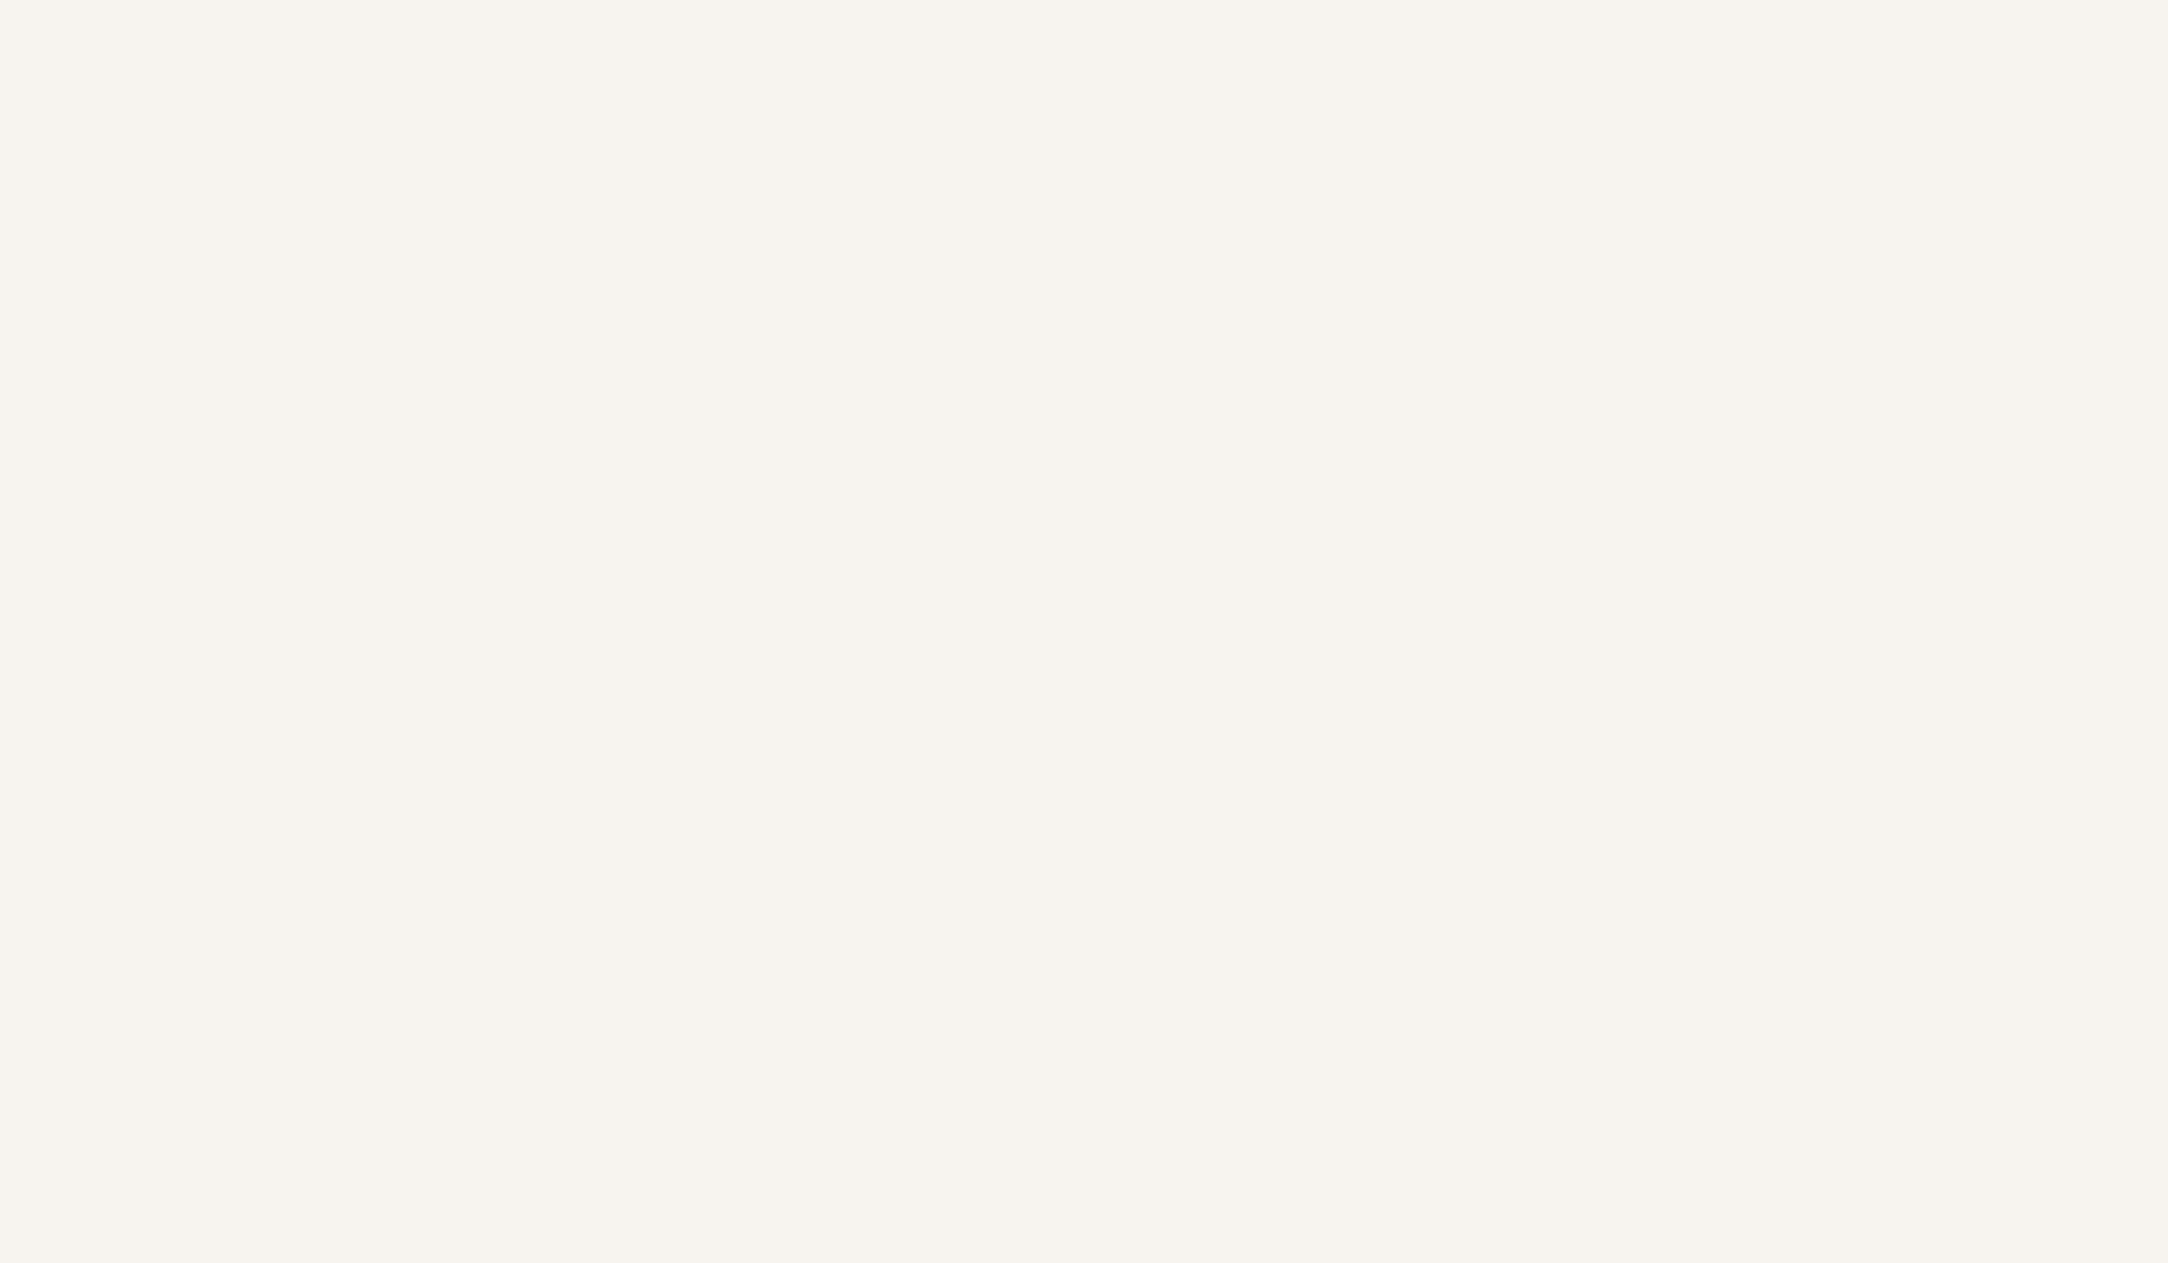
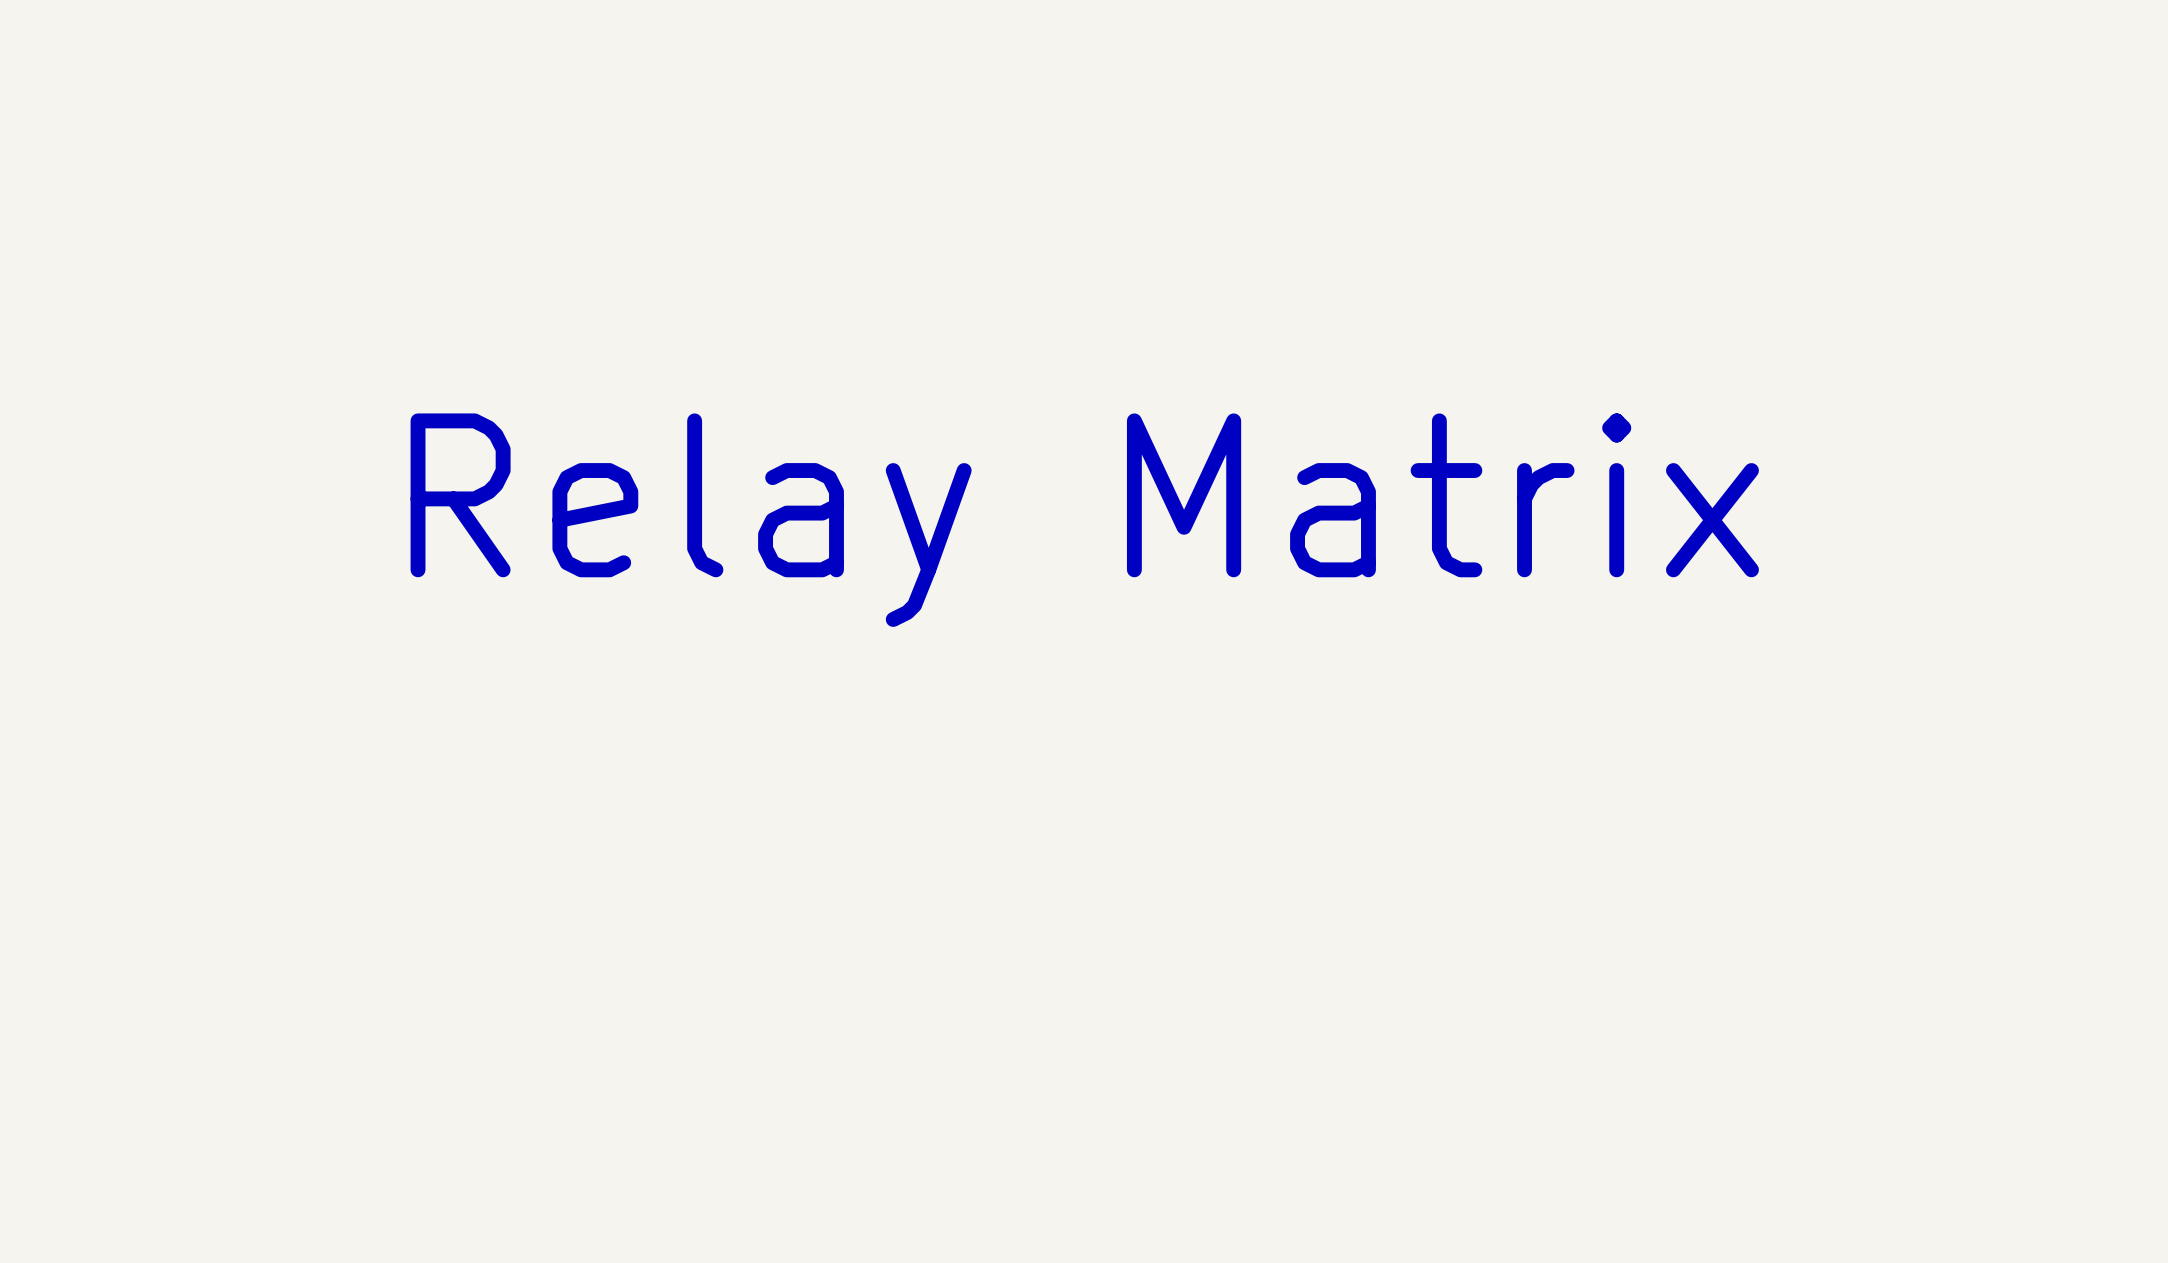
text: none -> Relay Matrix (1084, 520)

